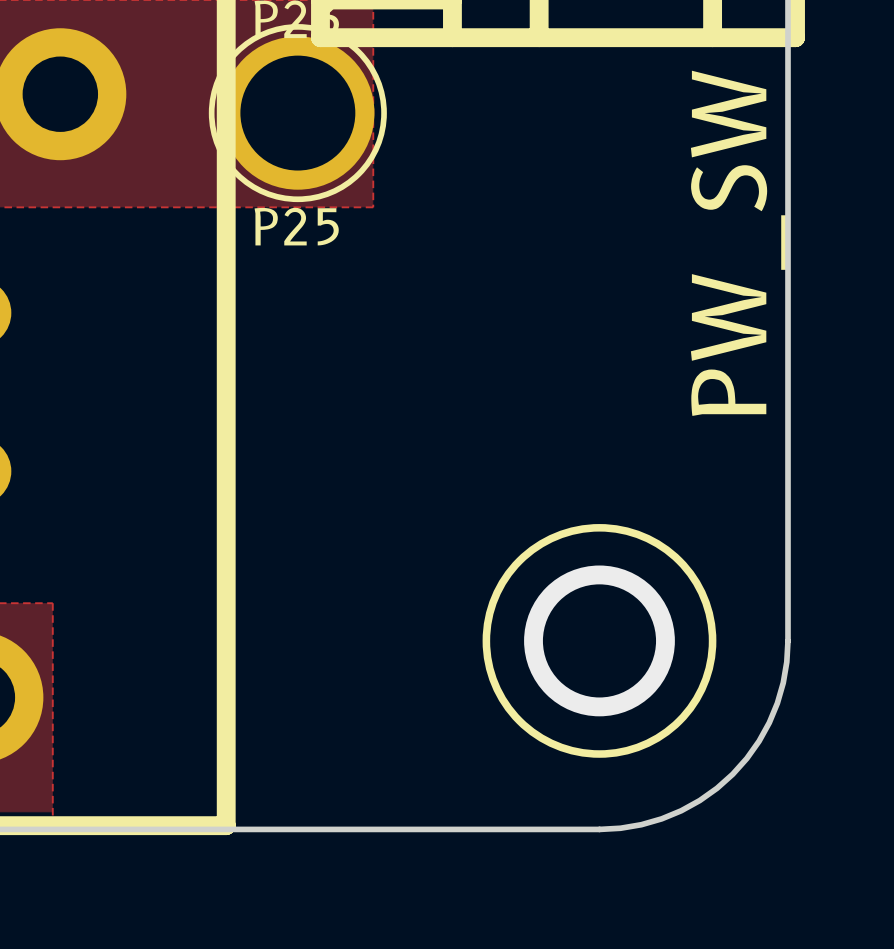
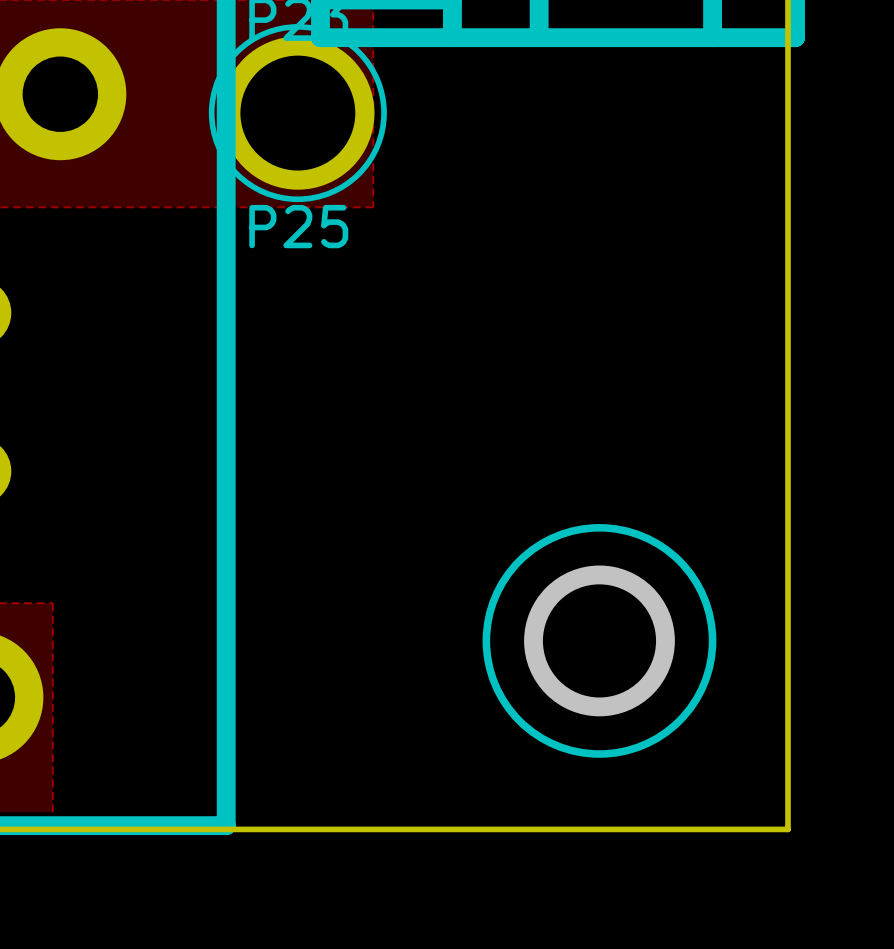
text: PW_SW (739, 243) -> none
board edge: (787, 640) (786, 662) (777, 703) (759, 741) (732, 774) (699, 800) (661, 818) (620, 828) (599, 829) -> (787, 640) (787, 829) (599, 829)

